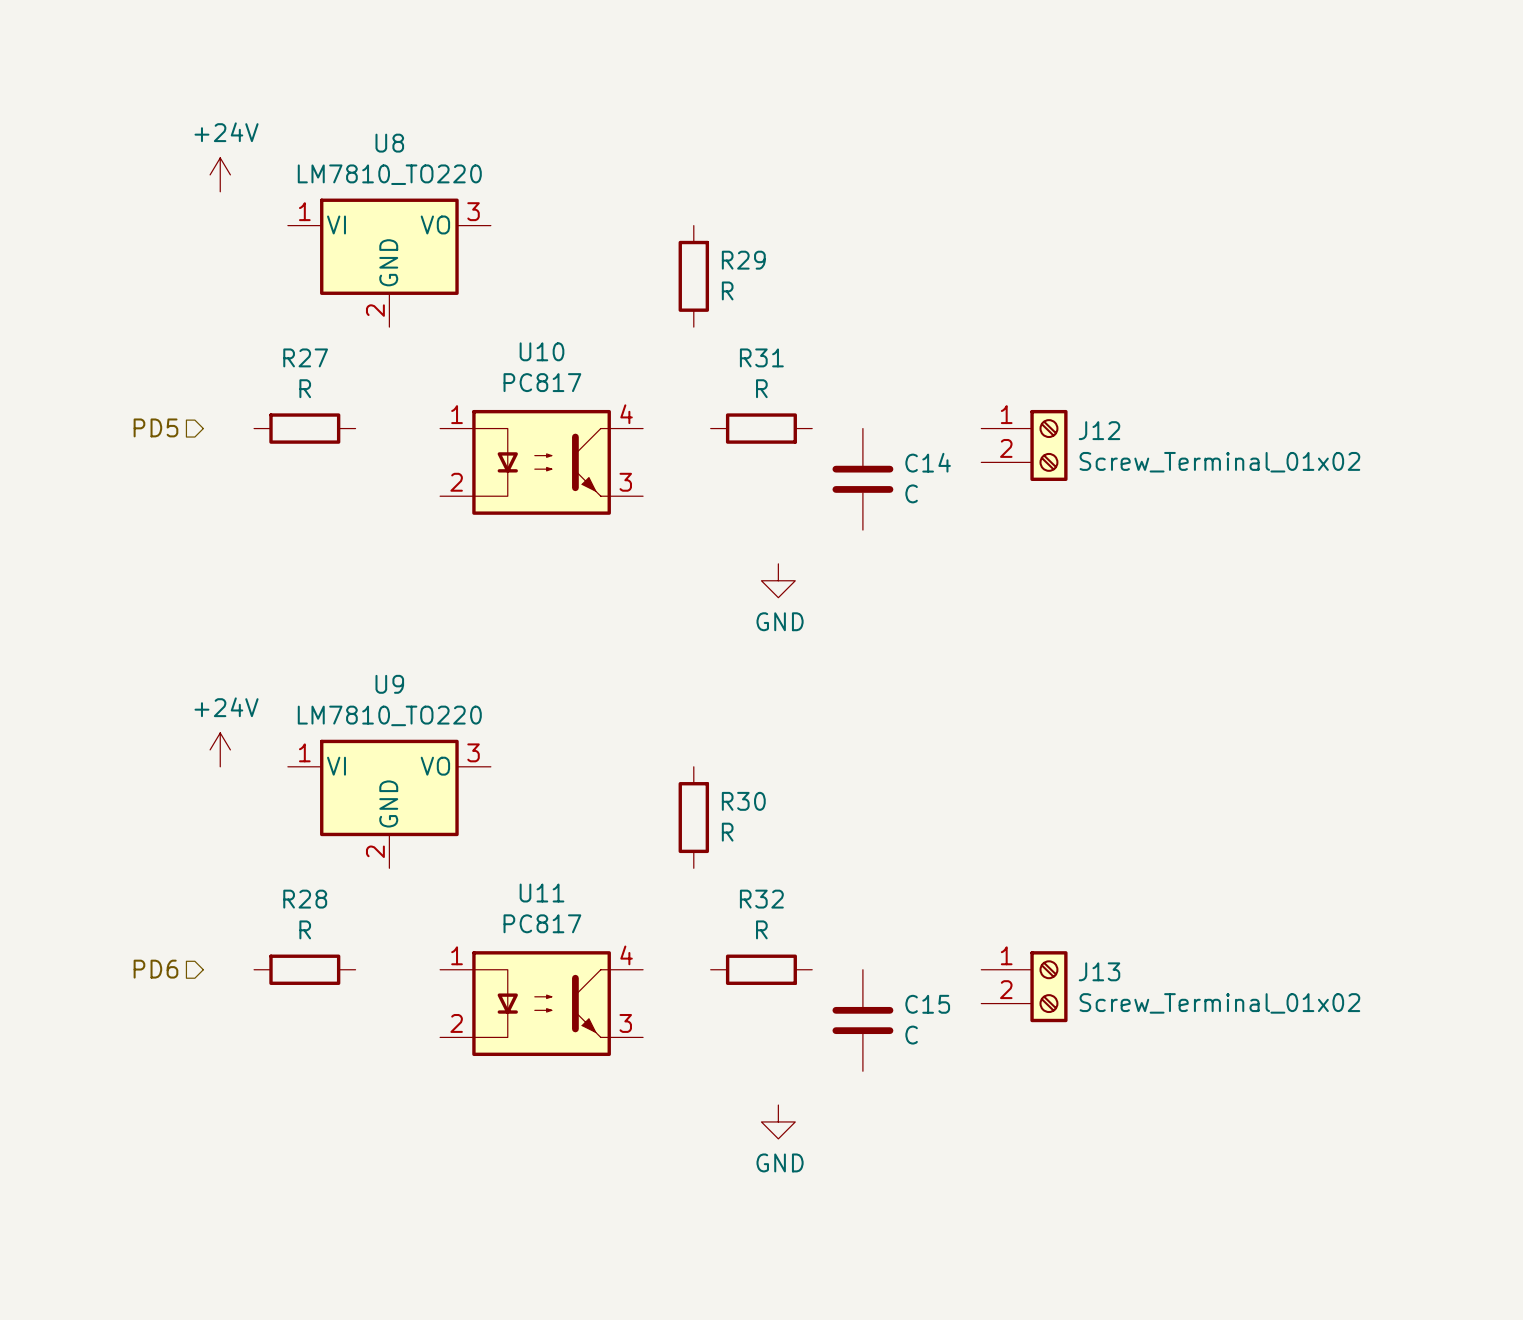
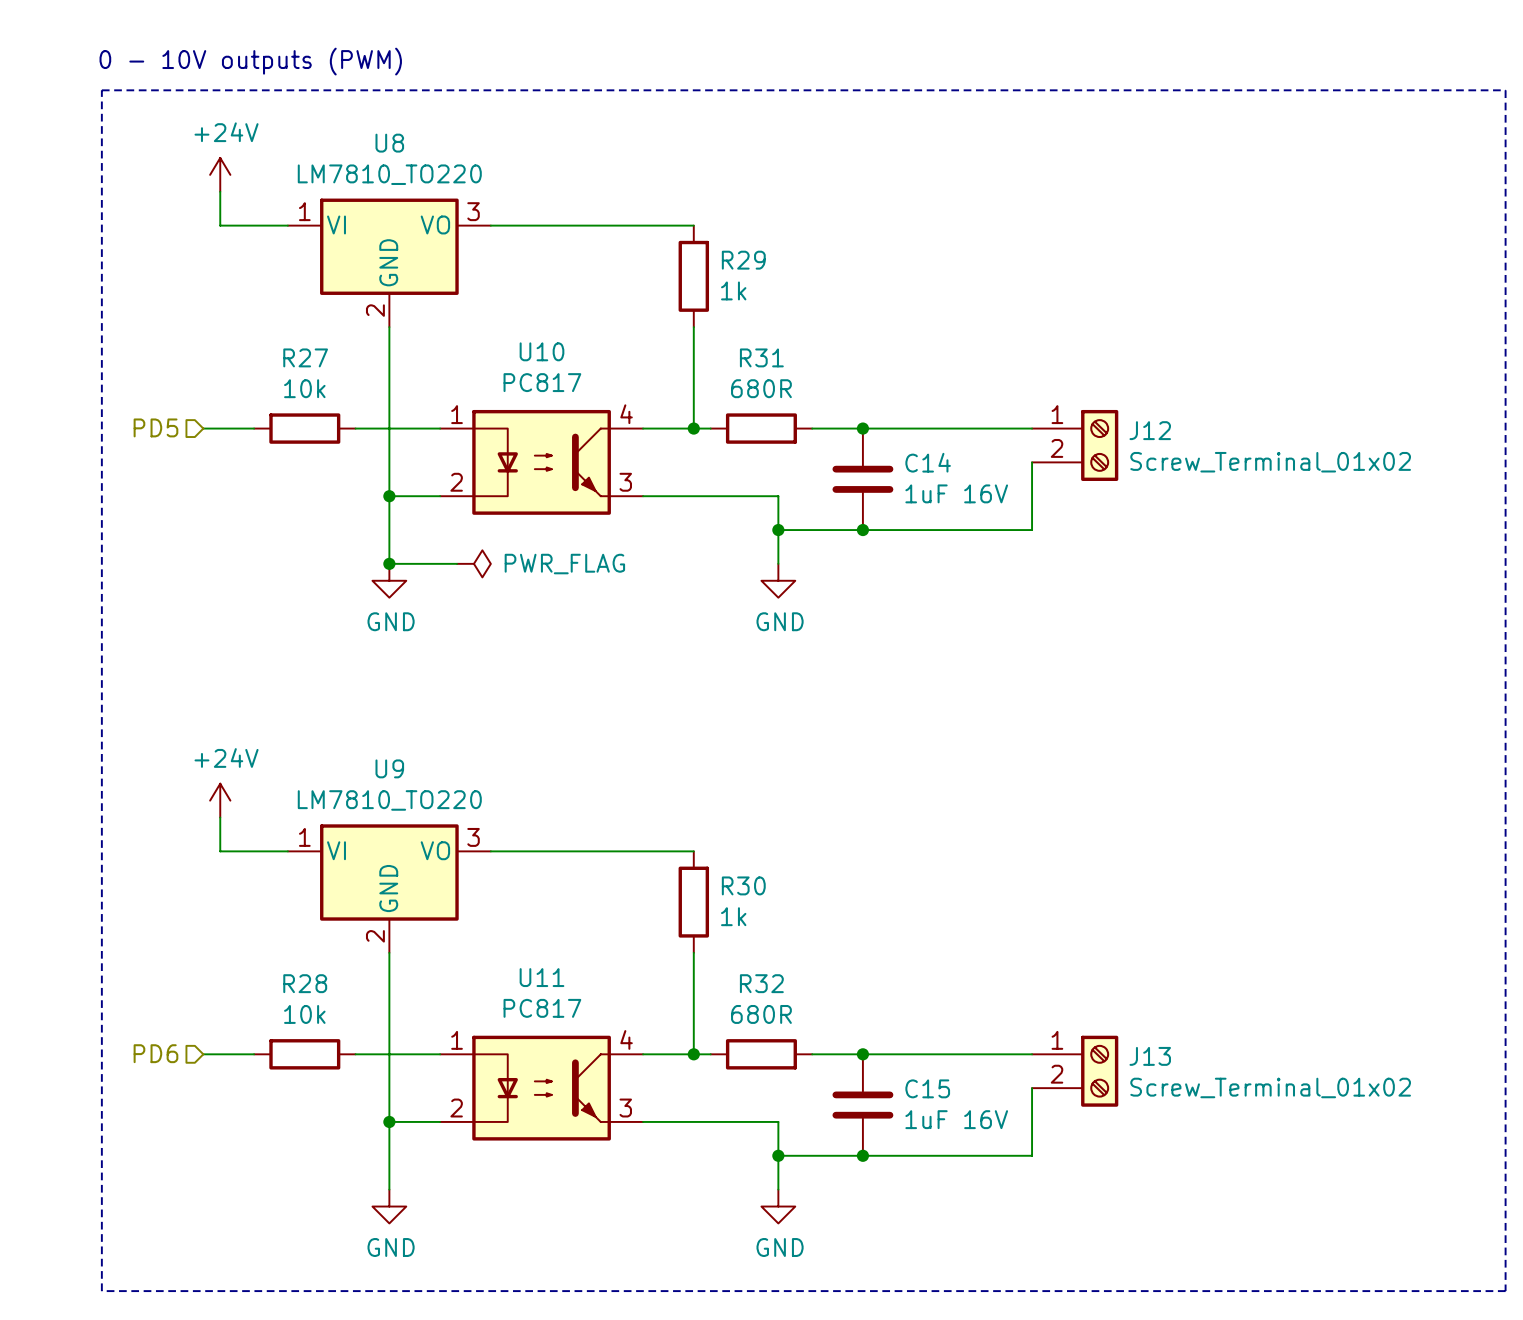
text: none -> 0 - 10V outputs (PWM) (250, 61)
line: none -> (101, 90) (1505, 90) (1505, 1291) (101, 1291) (101, 90)
wire: none -> (220, 191) (220, 225) (287, 225)
wire: none -> (490, 225) (693, 225)
R29 value: R (727, 290) -> 1k (733, 290)
wire: none -> (389, 327) (389, 563) (457, 563)
wire: none -> (693, 327) (693, 428)
R27 value: R (305, 388) -> 10k (304, 388)
R31 value: R (761, 388) -> 680R (761, 388)
wire: none -> (203, 428) (254, 428)
wire: none -> (355, 428) (440, 428)
wire: none -> (643, 428) (710, 428)
junction: none -> (693, 428)
wire: none -> (812, 428) (1032, 428)
junction: none -> (862, 428)
J12 position: (1024, 445) -> (1075, 445)
wire: none -> (1032, 462) (1032, 530) (778, 530)
C14 value: C (911, 493) -> 1uF 16V (956, 493)
wire: none -> (389, 496) (440, 496)
junction: none -> (389, 496)
wire: none -> (643, 496) (778, 496) (778, 563)
junction: none -> (778, 530)
junction: none -> (862, 530)
junction: none -> (389, 563)
power symbol: none -> PWR_FLAG (473, 563)
power symbol: none -> GND (389, 580)
power symbol position: +24V (220, 749) -> +24V (220, 800)
U9 position: (389, 804) -> (389, 888)
wire: none -> (220, 817) (220, 851) (287, 851)
R30 position: (693, 817) -> (693, 902)
R30 value: R (727, 832) -> 1k (733, 916)
wire: none -> (490, 851) (693, 851)
R28 value: R (305, 929) -> 10k (304, 1014)
R32 value: R (761, 929) -> 680R (761, 1014)
wire: none -> (389, 952) (389, 1189)
wire: none -> (693, 952) (693, 1054)
hierarchical label position: PD6 (155, 969) -> PD6 (155, 1053)
R28 position: (304, 969) -> (304, 1054)
R32 position: (761, 969) -> (761, 1054)
J13 position: (1024, 986) -> (1075, 1071)
U11 position: (541, 1003) -> (541, 1088)
C15 position: (862, 1020) -> (862, 1105)
C15 value: C (911, 1035) -> 1uF 16V (956, 1119)
wire: none -> (203, 1054) (254, 1054)
wire: none -> (355, 1054) (440, 1054)
wire: none -> (643, 1054) (710, 1054)
junction: none -> (693, 1054)
wire: none -> (812, 1054) (1032, 1054)
junction: none -> (862, 1054)
wire: none -> (1032, 1088) (1032, 1155) (778, 1155)
wire: none -> (389, 1121) (440, 1121)
junction: none -> (389, 1121)
wire: none -> (643, 1121) (778, 1121) (778, 1189)
power symbol position: GND (778, 1121) -> GND (778, 1206)
junction: none -> (778, 1155)
junction: none -> (862, 1155)
power symbol: none -> GND (389, 1206)

